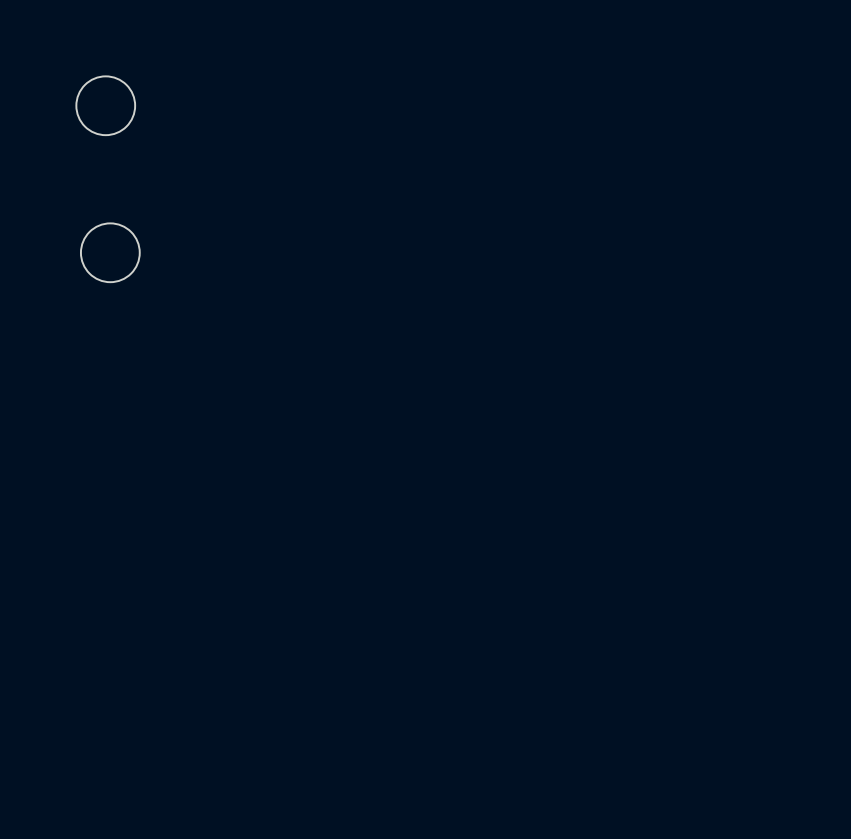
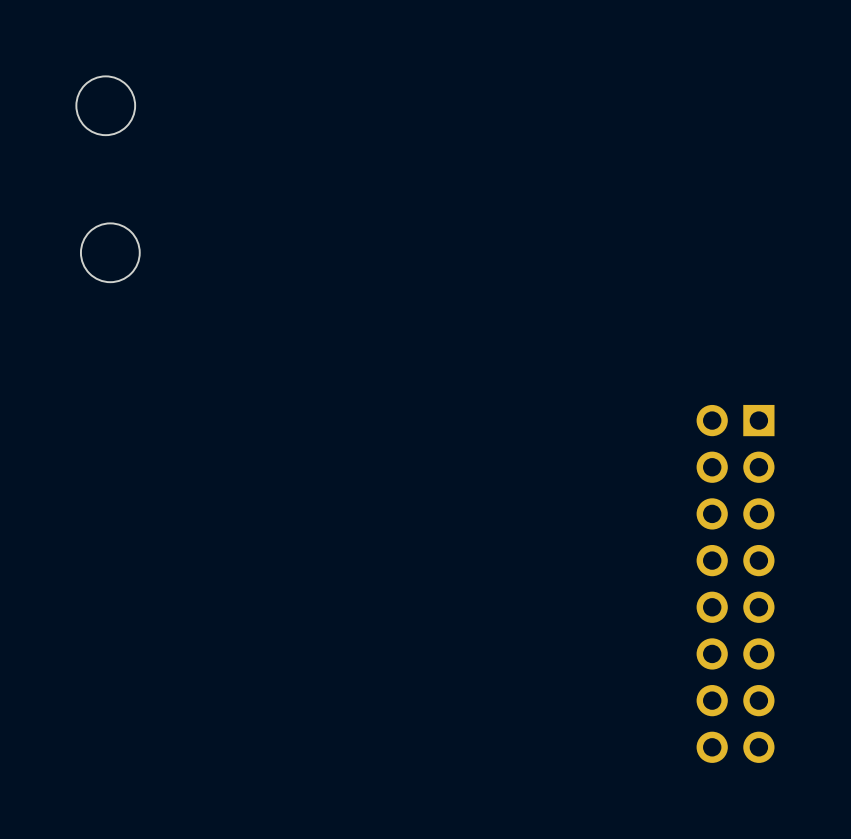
part: none -> (735, 583)

